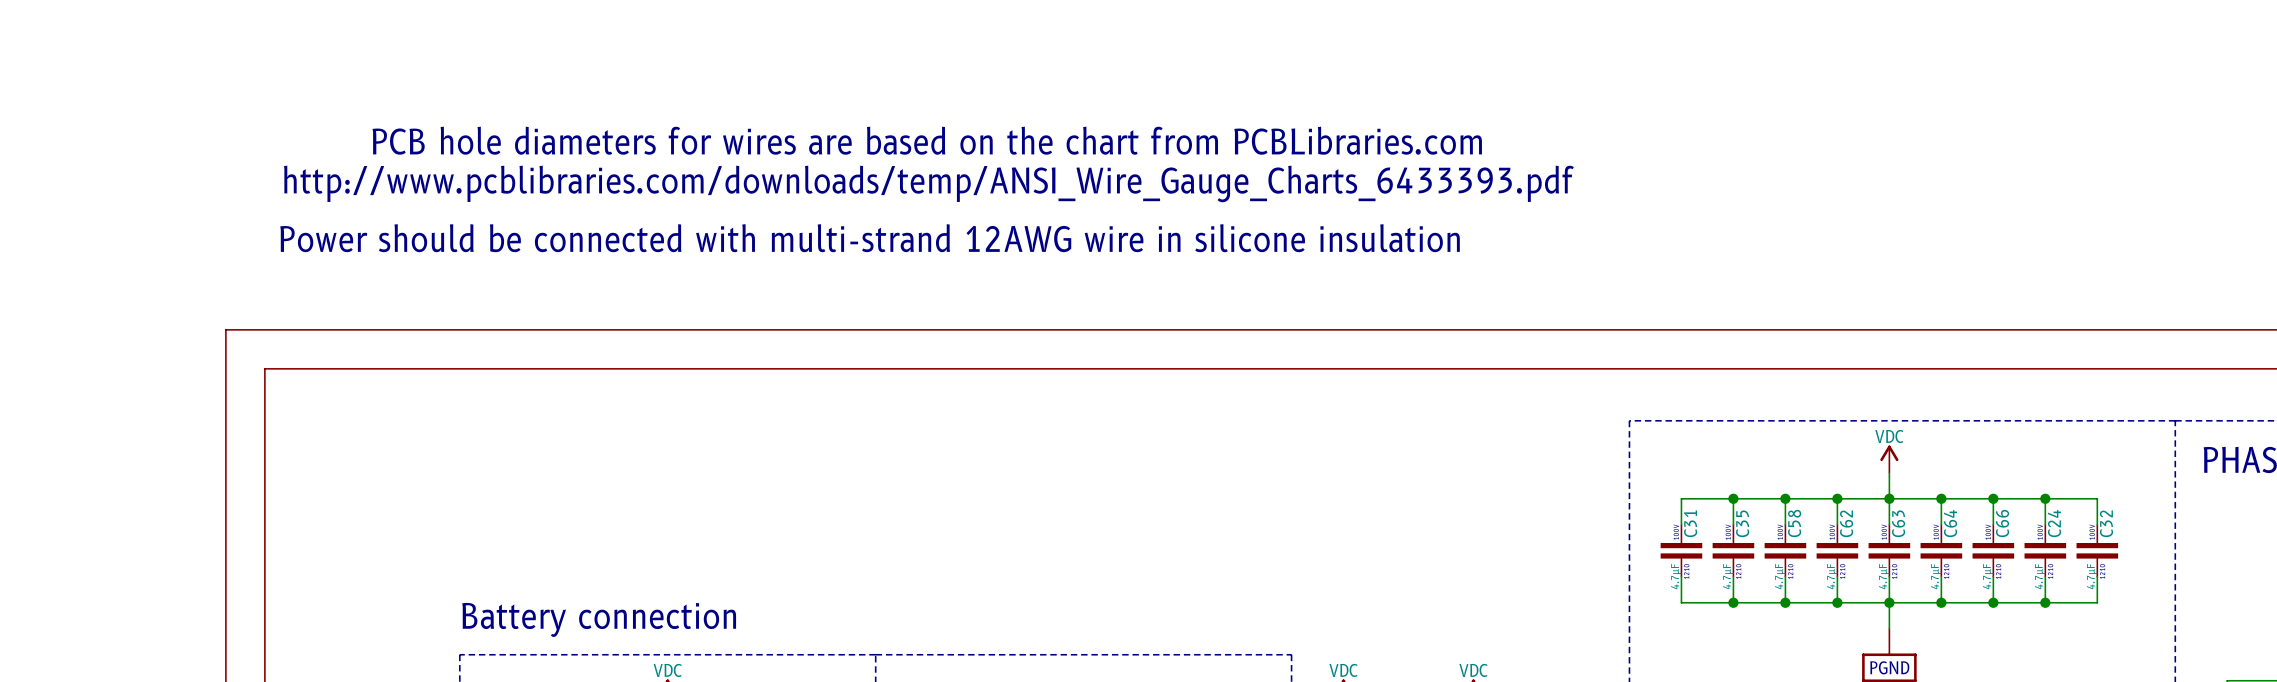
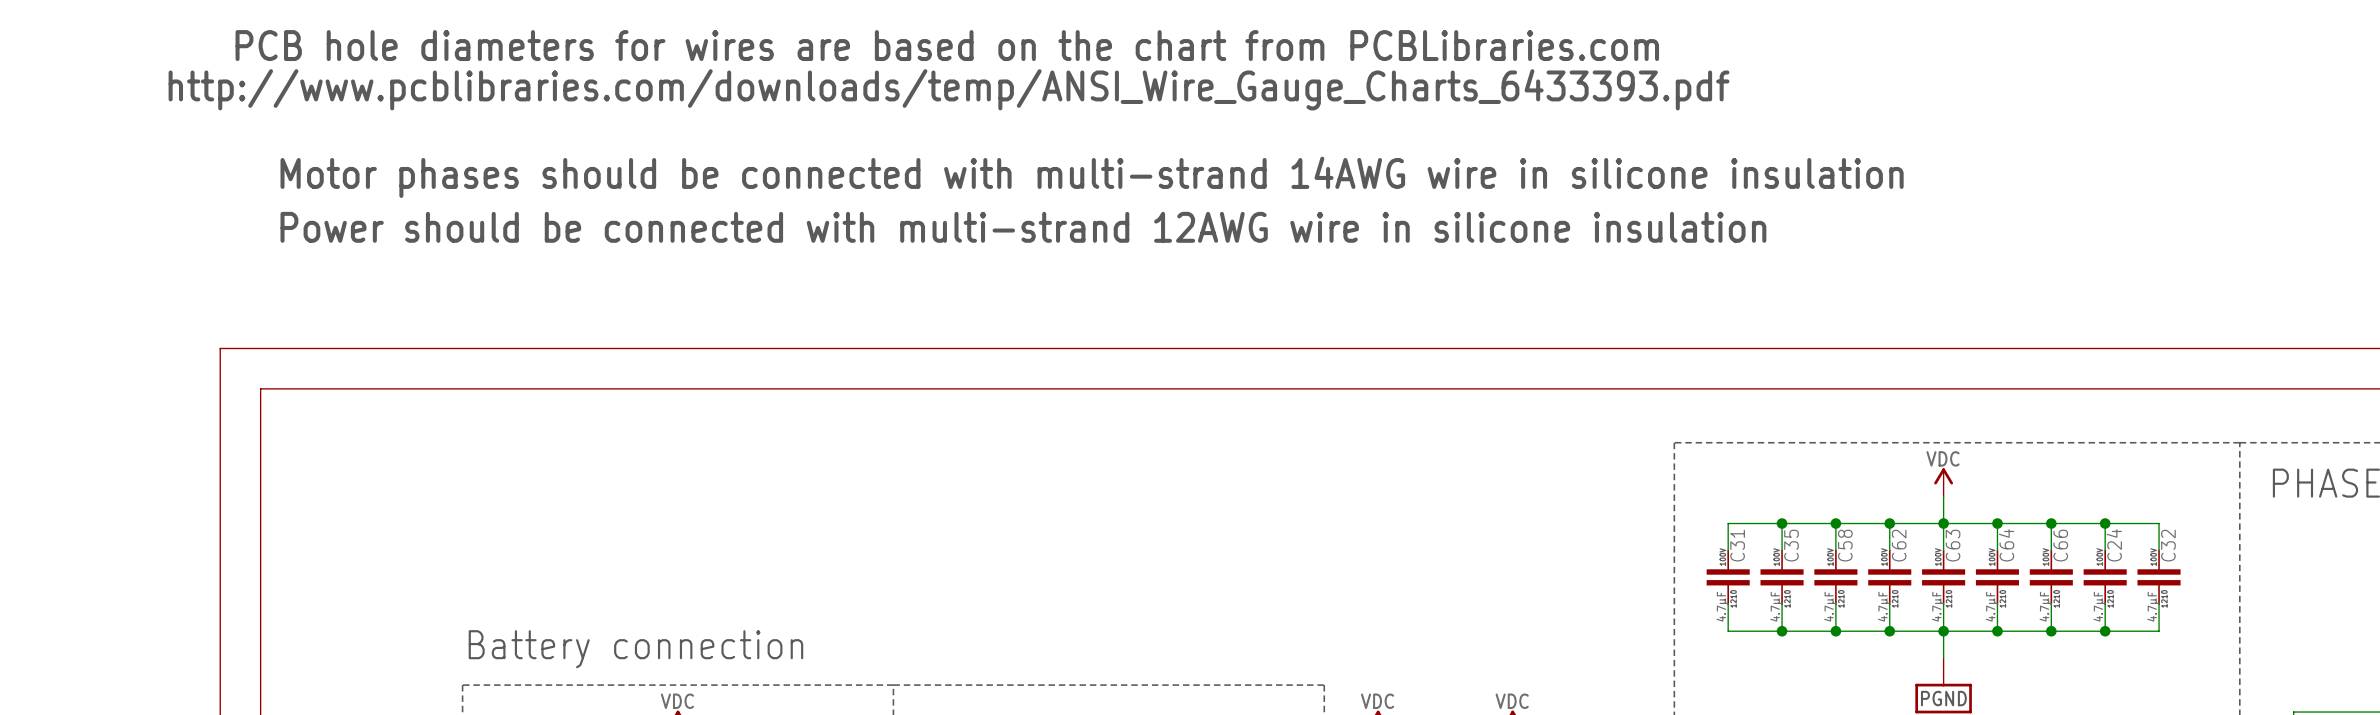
text position: PCB hole diameters for wires are based on the chart from PCBLibraries.com (927, 140) -> PCB hole diameters for wires are based on the chart from PCBLibraries.com (947, 45)
text: none -> Motor phases should be connected with multi-strand 14AWG wire in silicone insulation (1092, 177)
text position: http://www.pcblibraries.com/downloads/temp/ANSI_Wire_Gauge_Charts_6433393.pdf (928, 183) -> http://www.pcblibraries.com/downloads/temp/ANSI_Wire_Gauge_Charts_6433393.pdf (949, 89)
text position: Power should be connected with multi-strand 12AWG wire in silicone insulation (870, 238) -> Power should be connected with multi-strand 12AWG wire in silicone insulation (1023, 227)

